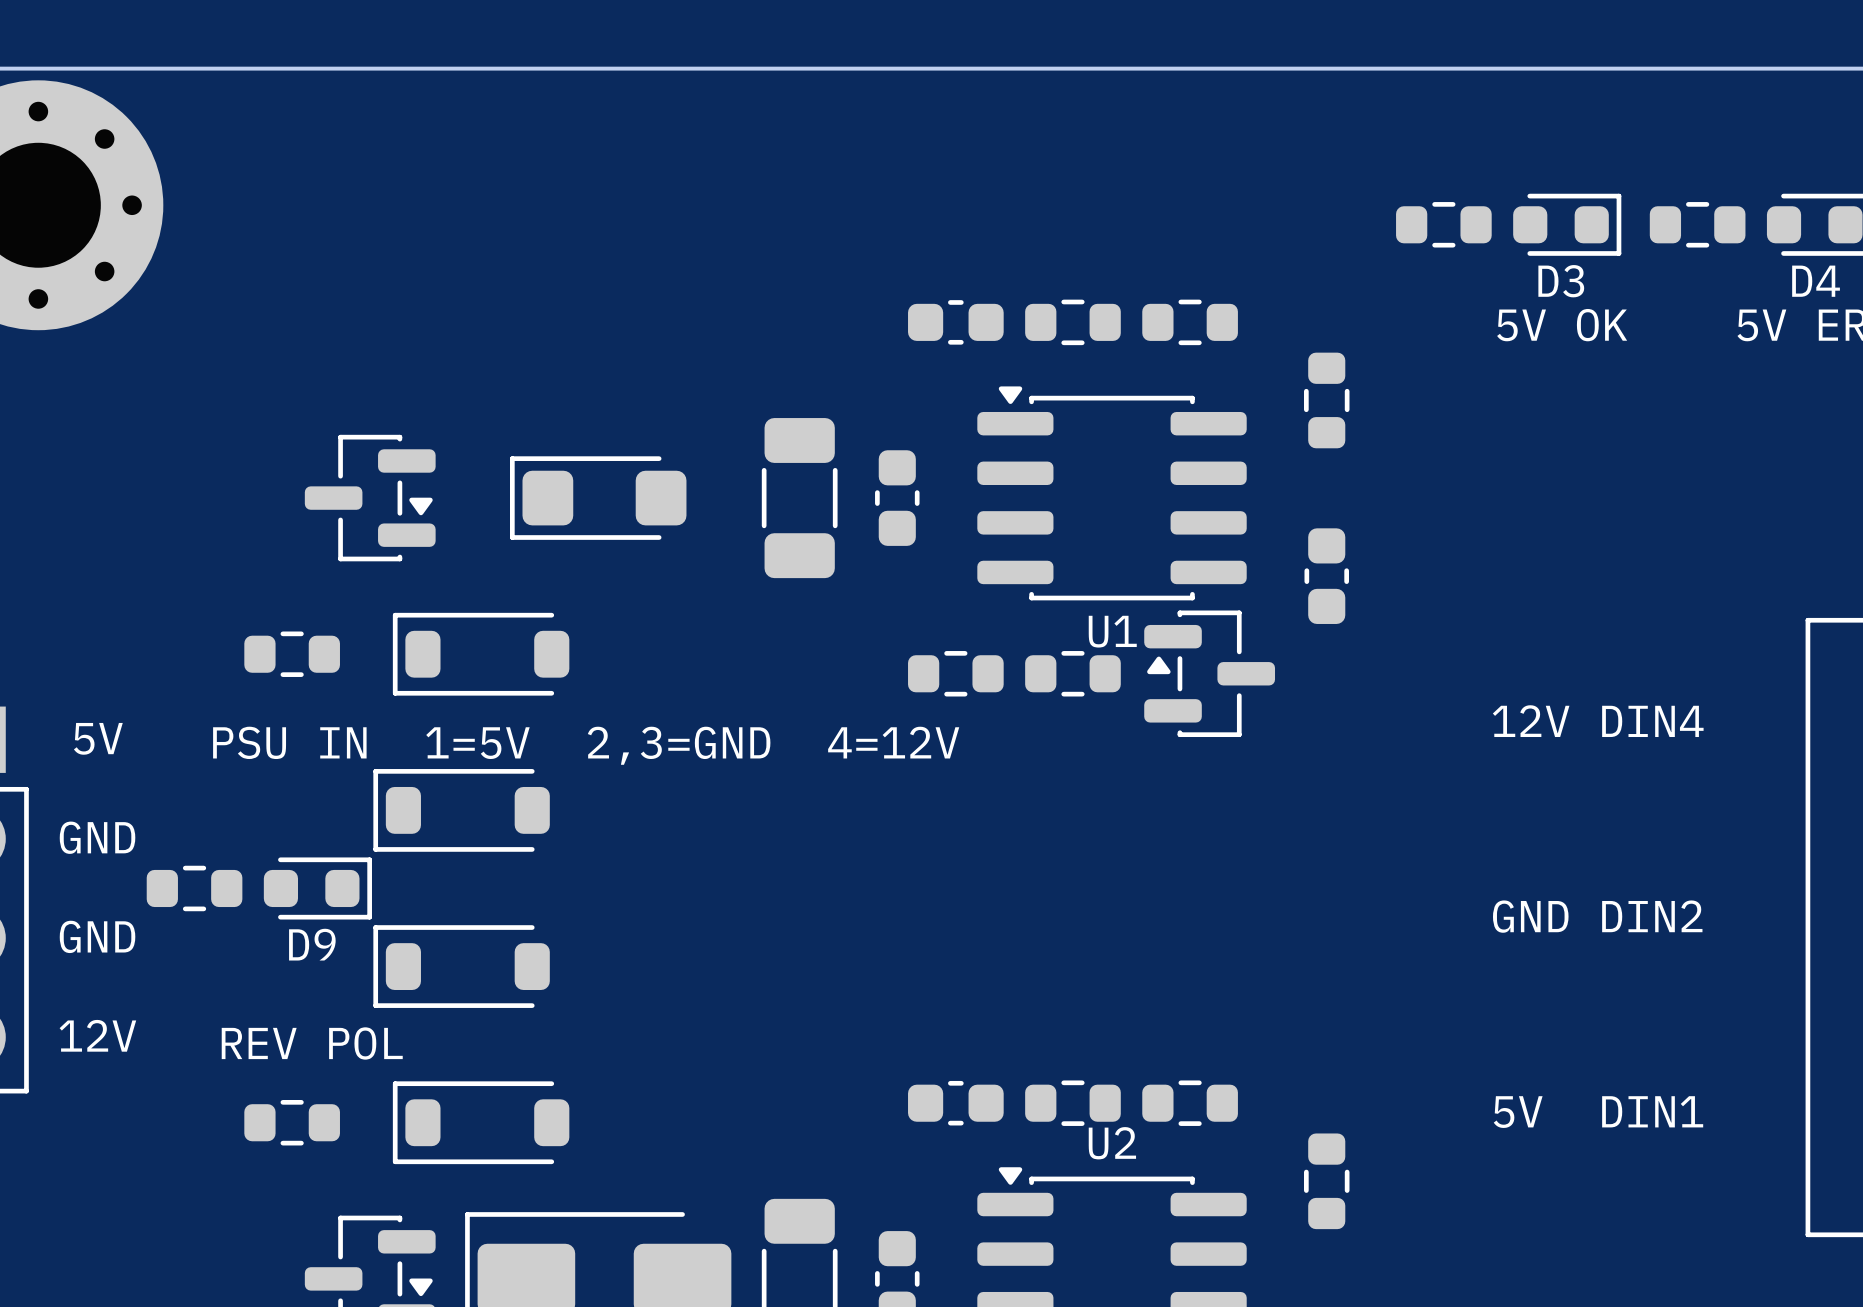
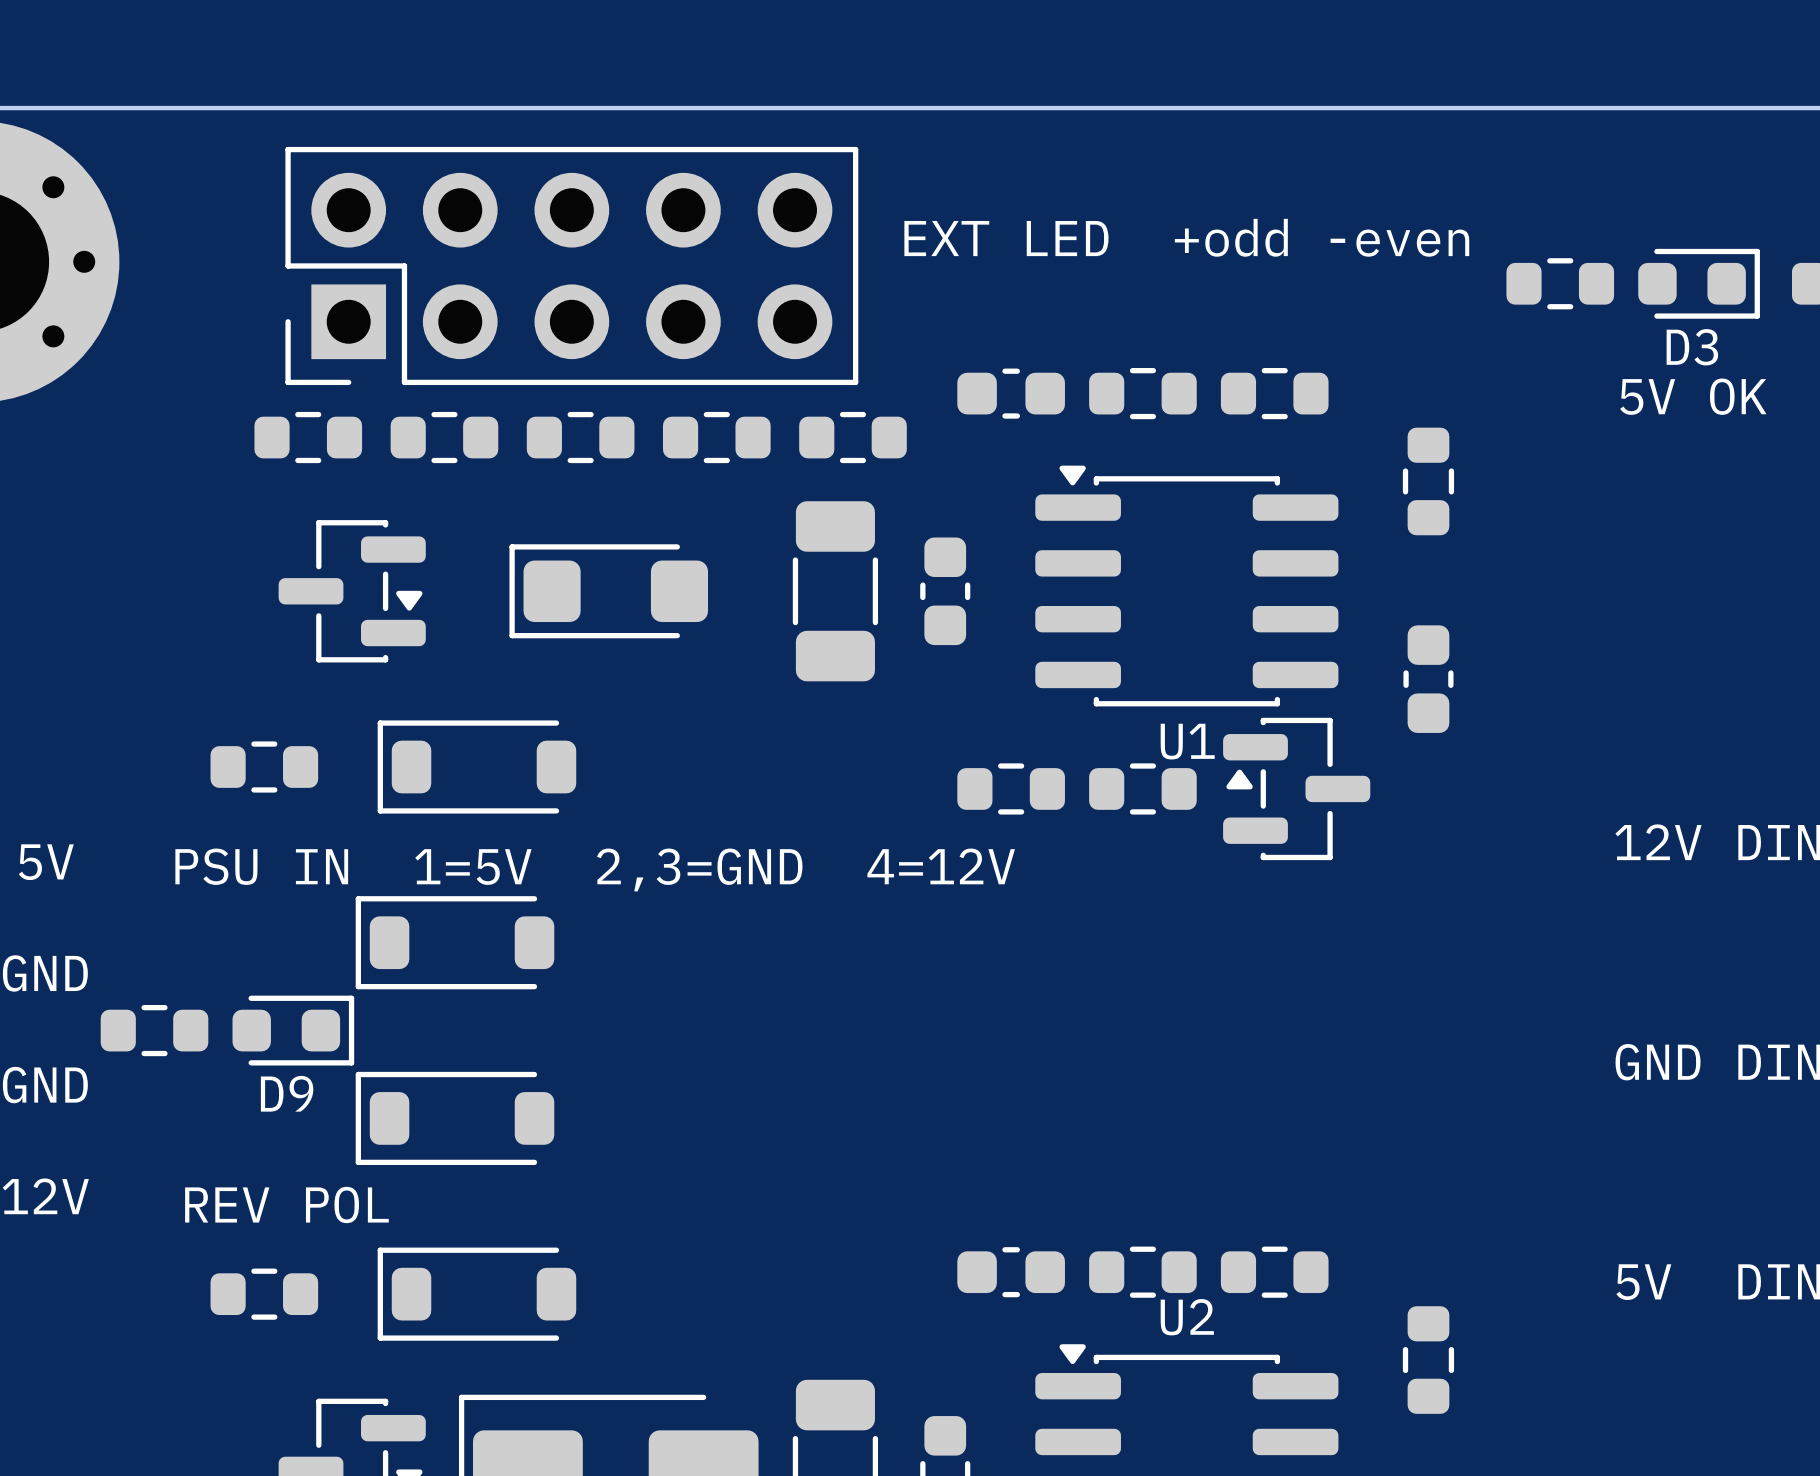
text: none -> EXT LED +odd -even (1186, 237)
part: none -> (571, 265)
part: none -> (308, 437)
part: none -> (444, 437)
part: none -> (580, 437)
part: none -> (716, 437)
part: none -> (853, 437)

